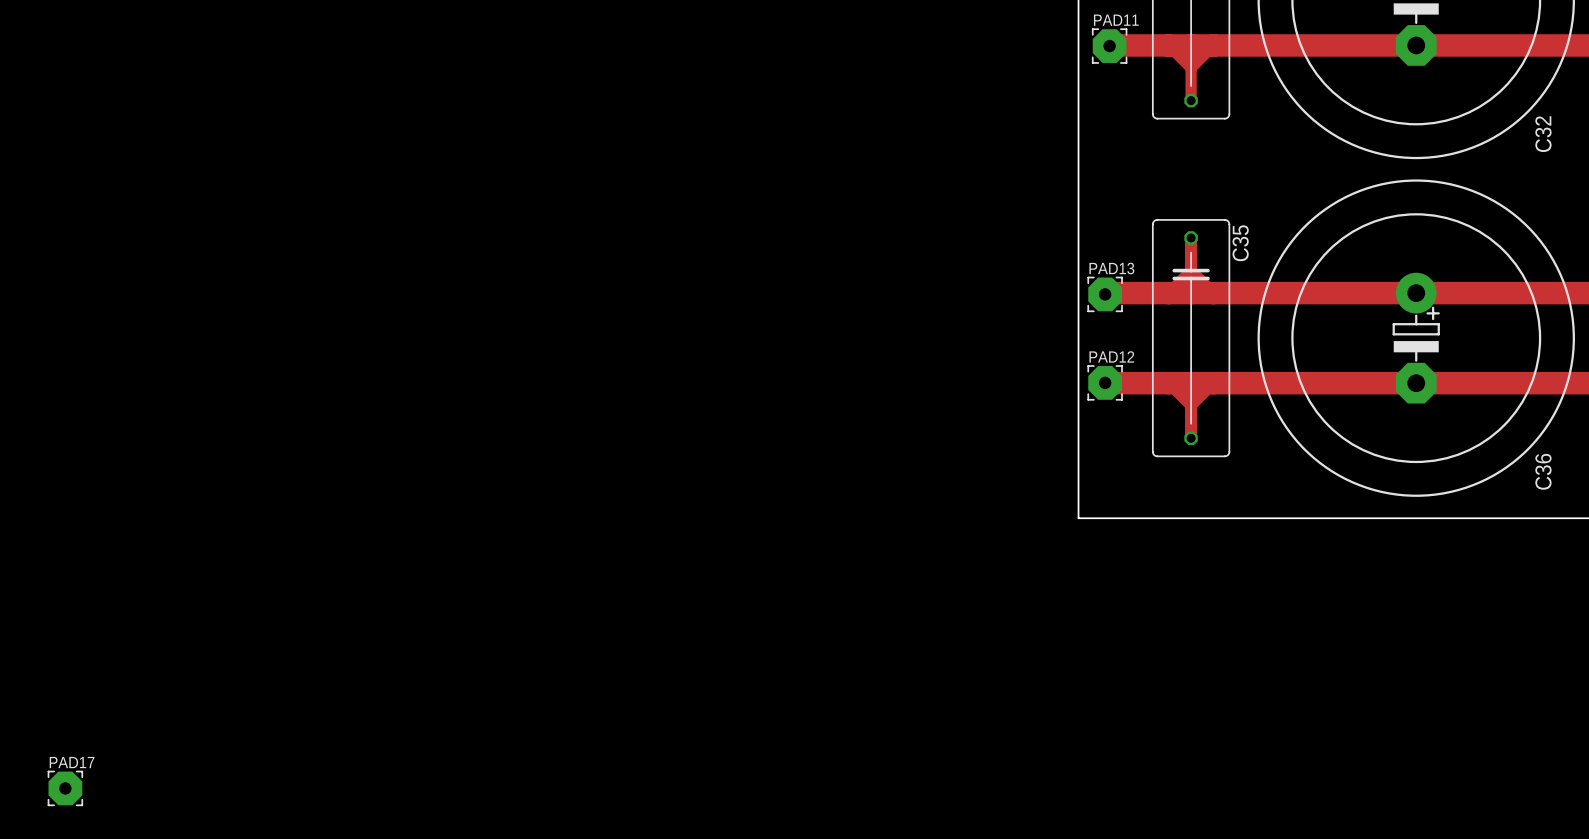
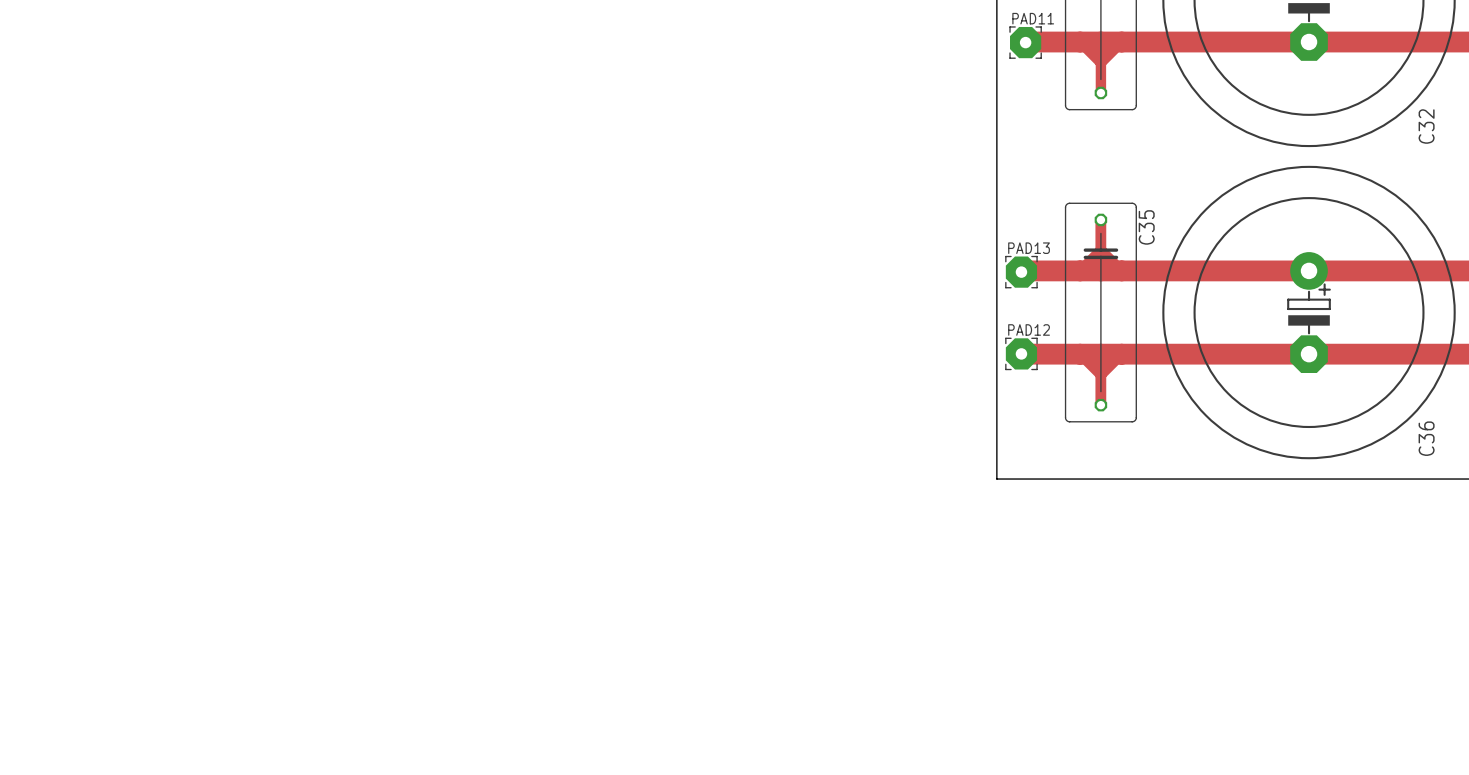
PAD17: (65, 788) -> none

